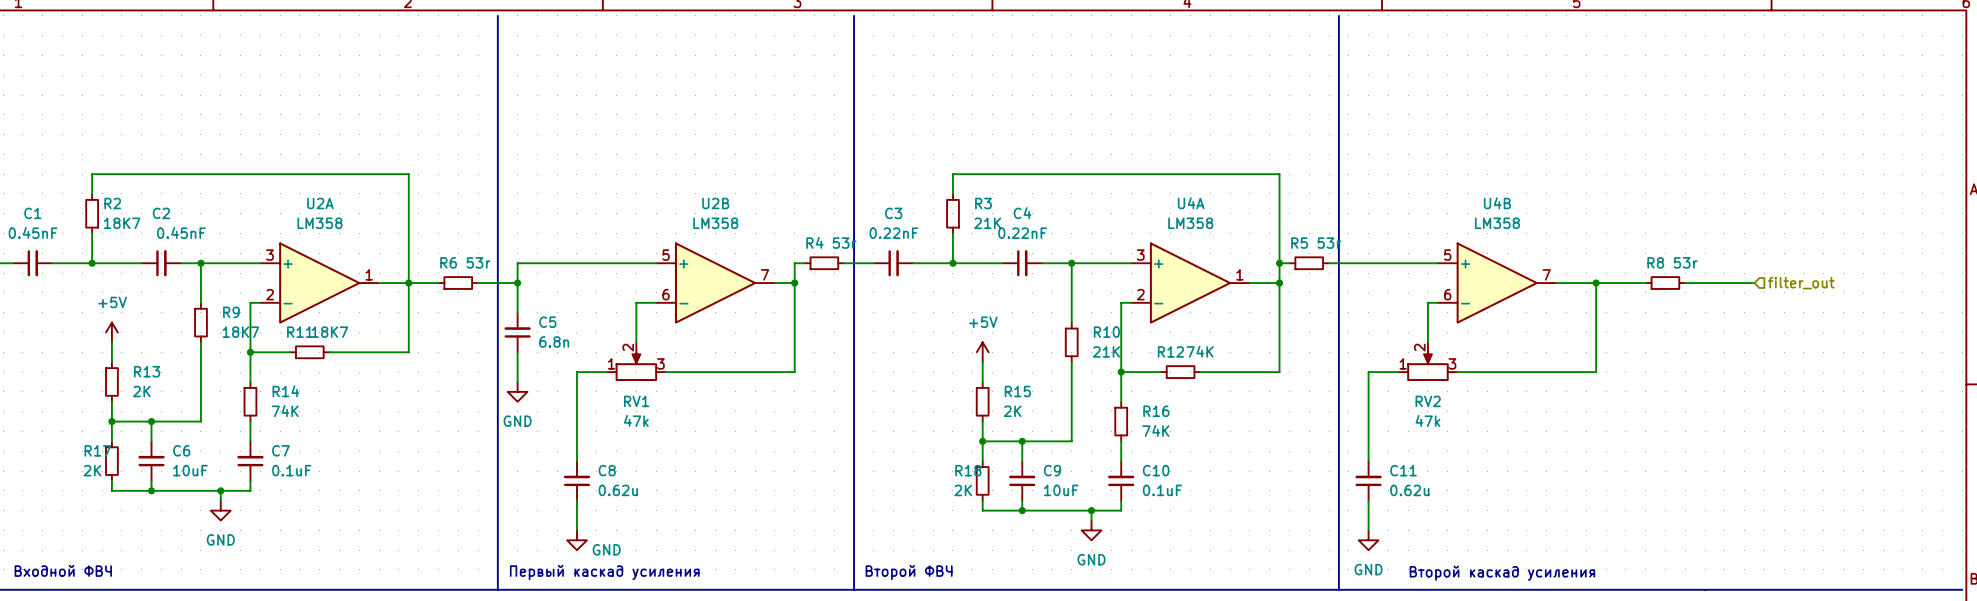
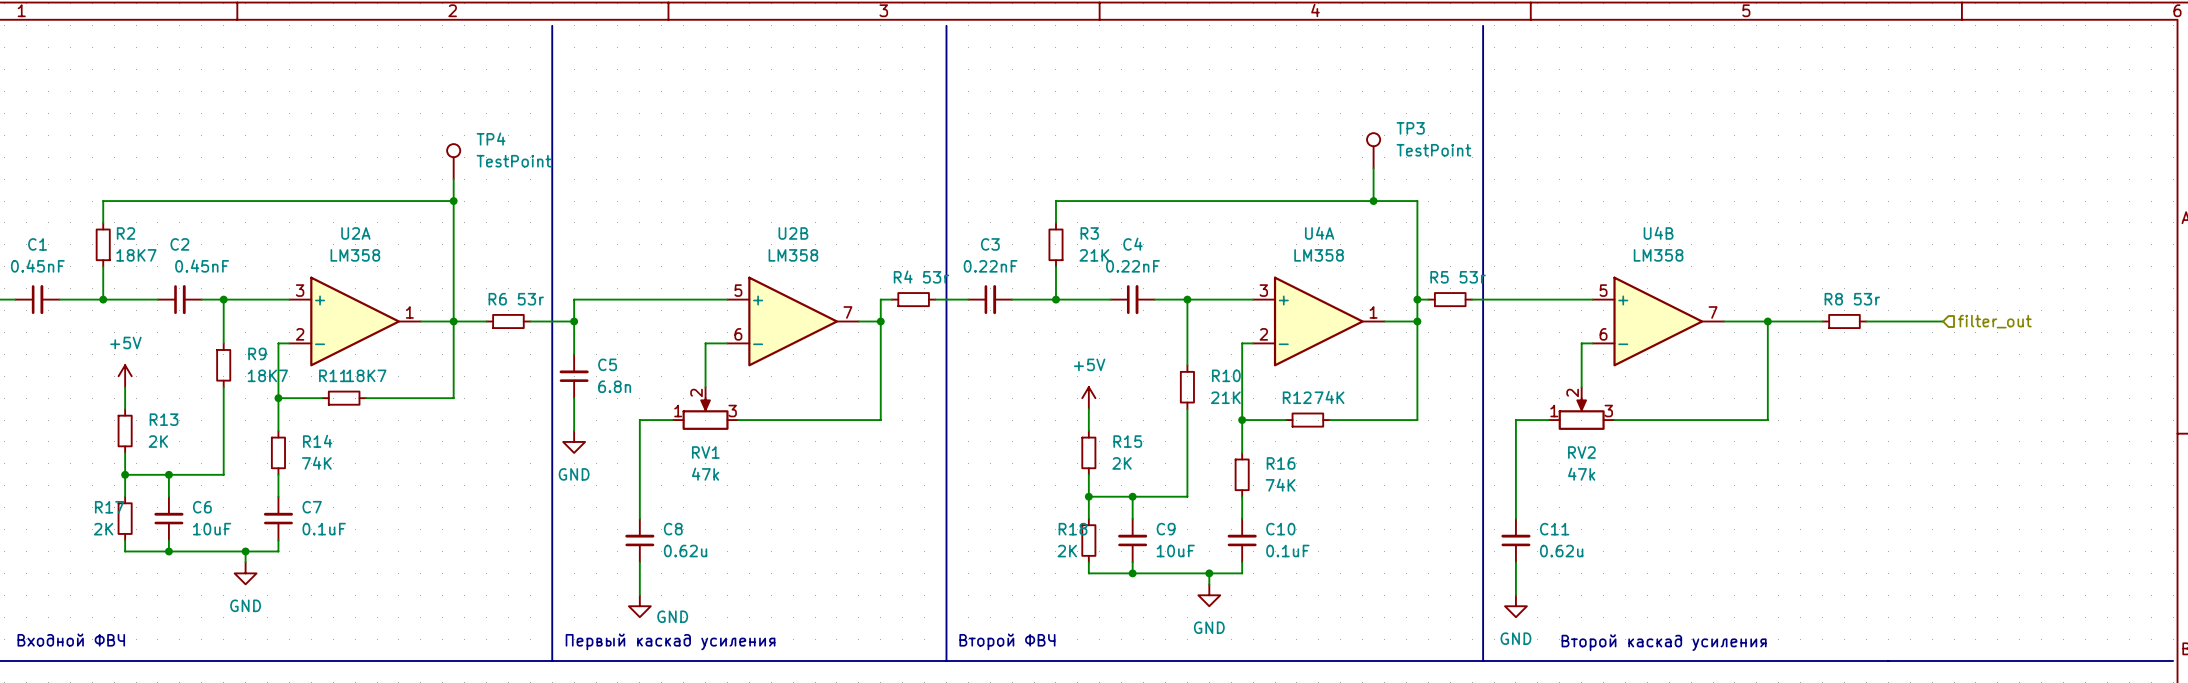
TP3: none -> TestPoint (1373, 150)
TP4: none -> TestPoint (453, 161)
wire: none -> (1373, 168) (1373, 201)
wire: none -> (453, 179) (453, 201)
junction: none -> (453, 201)
junction: none -> (1373, 201)

